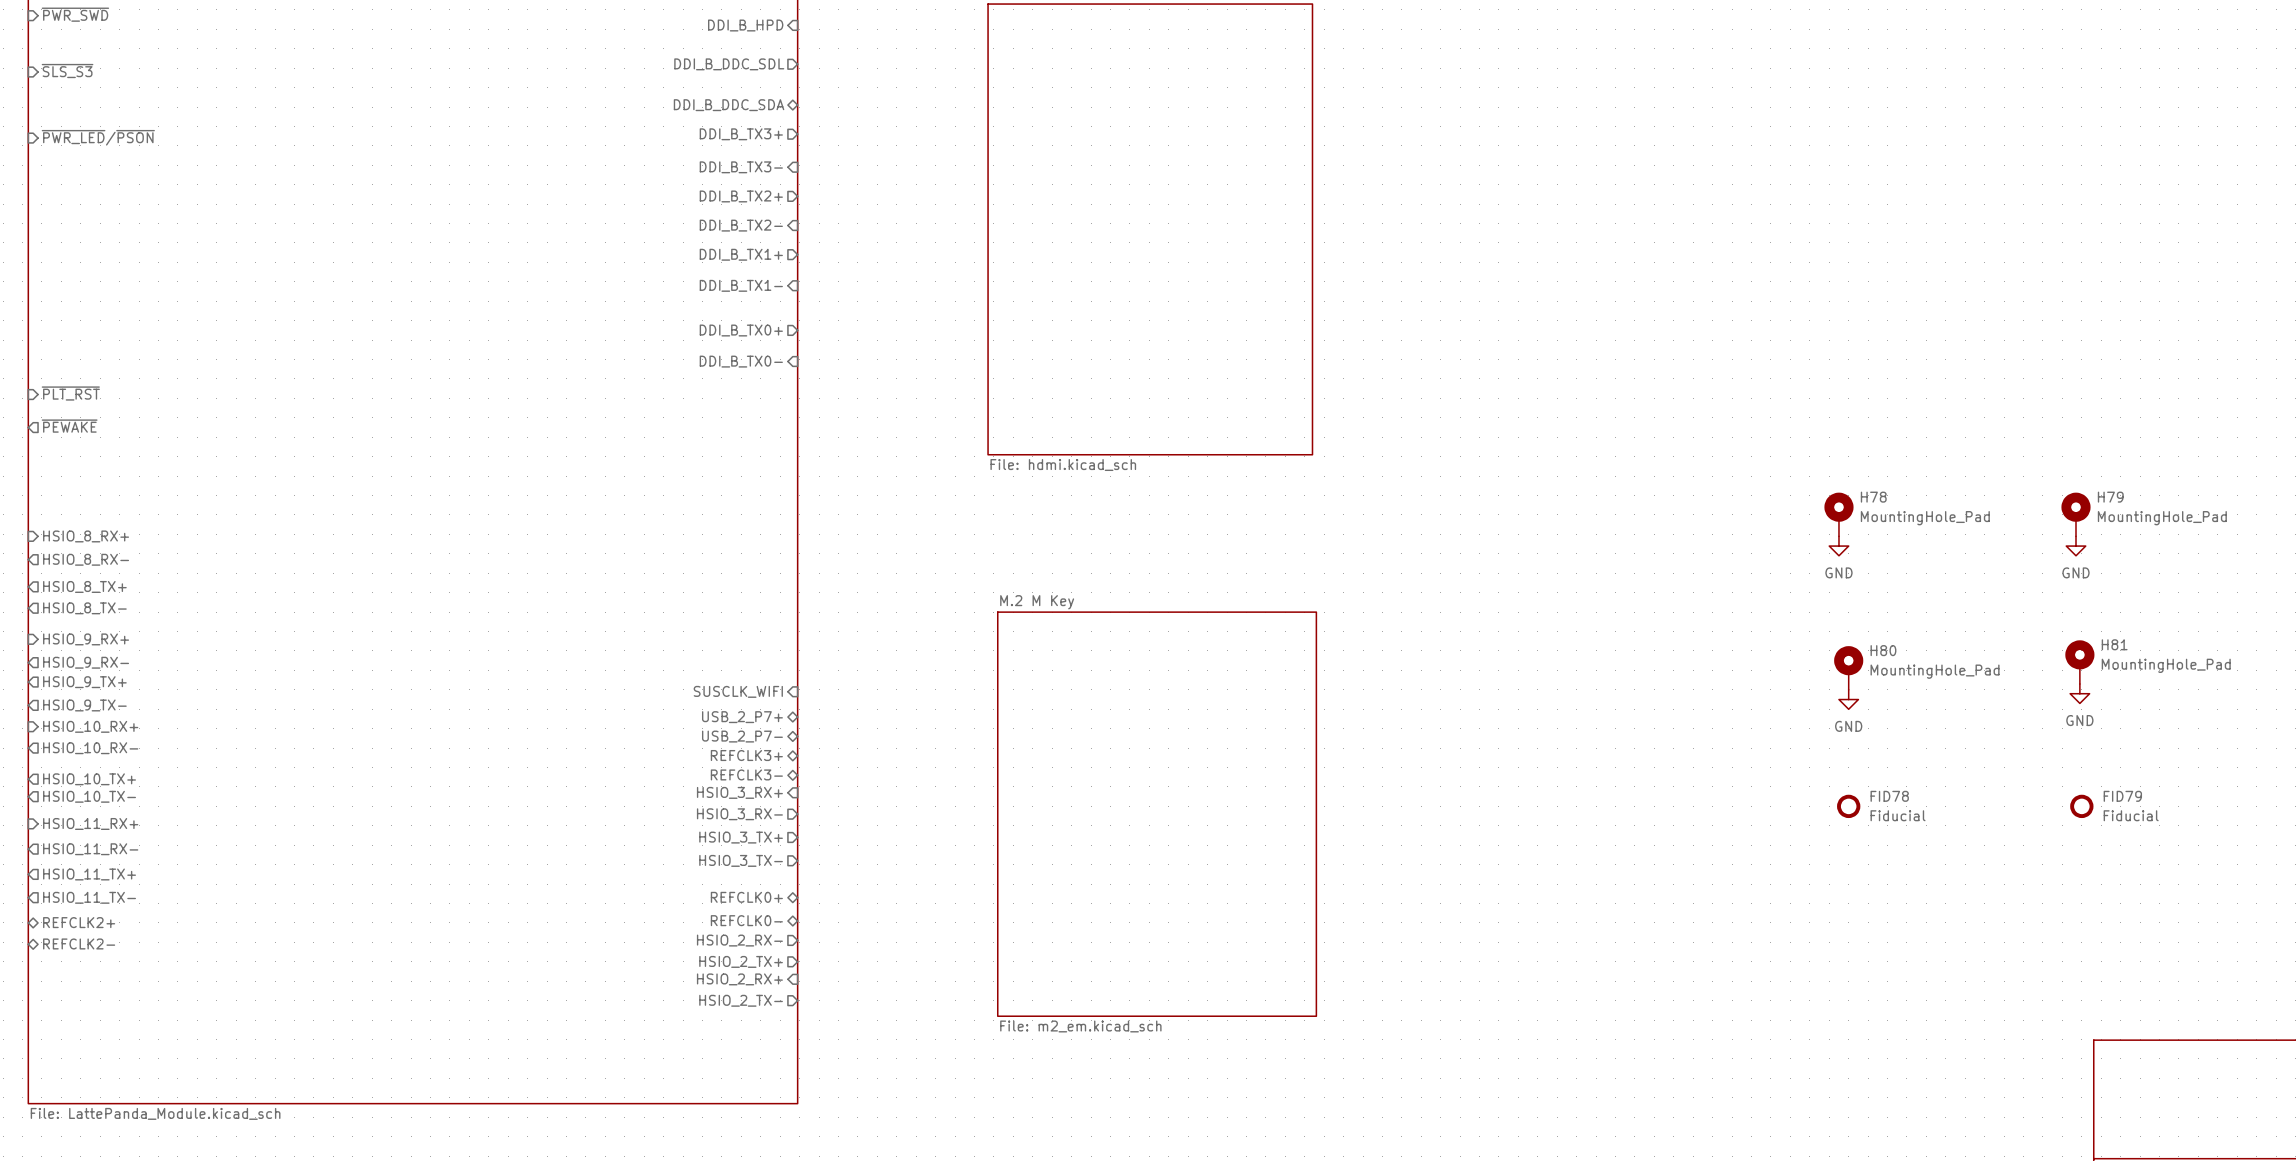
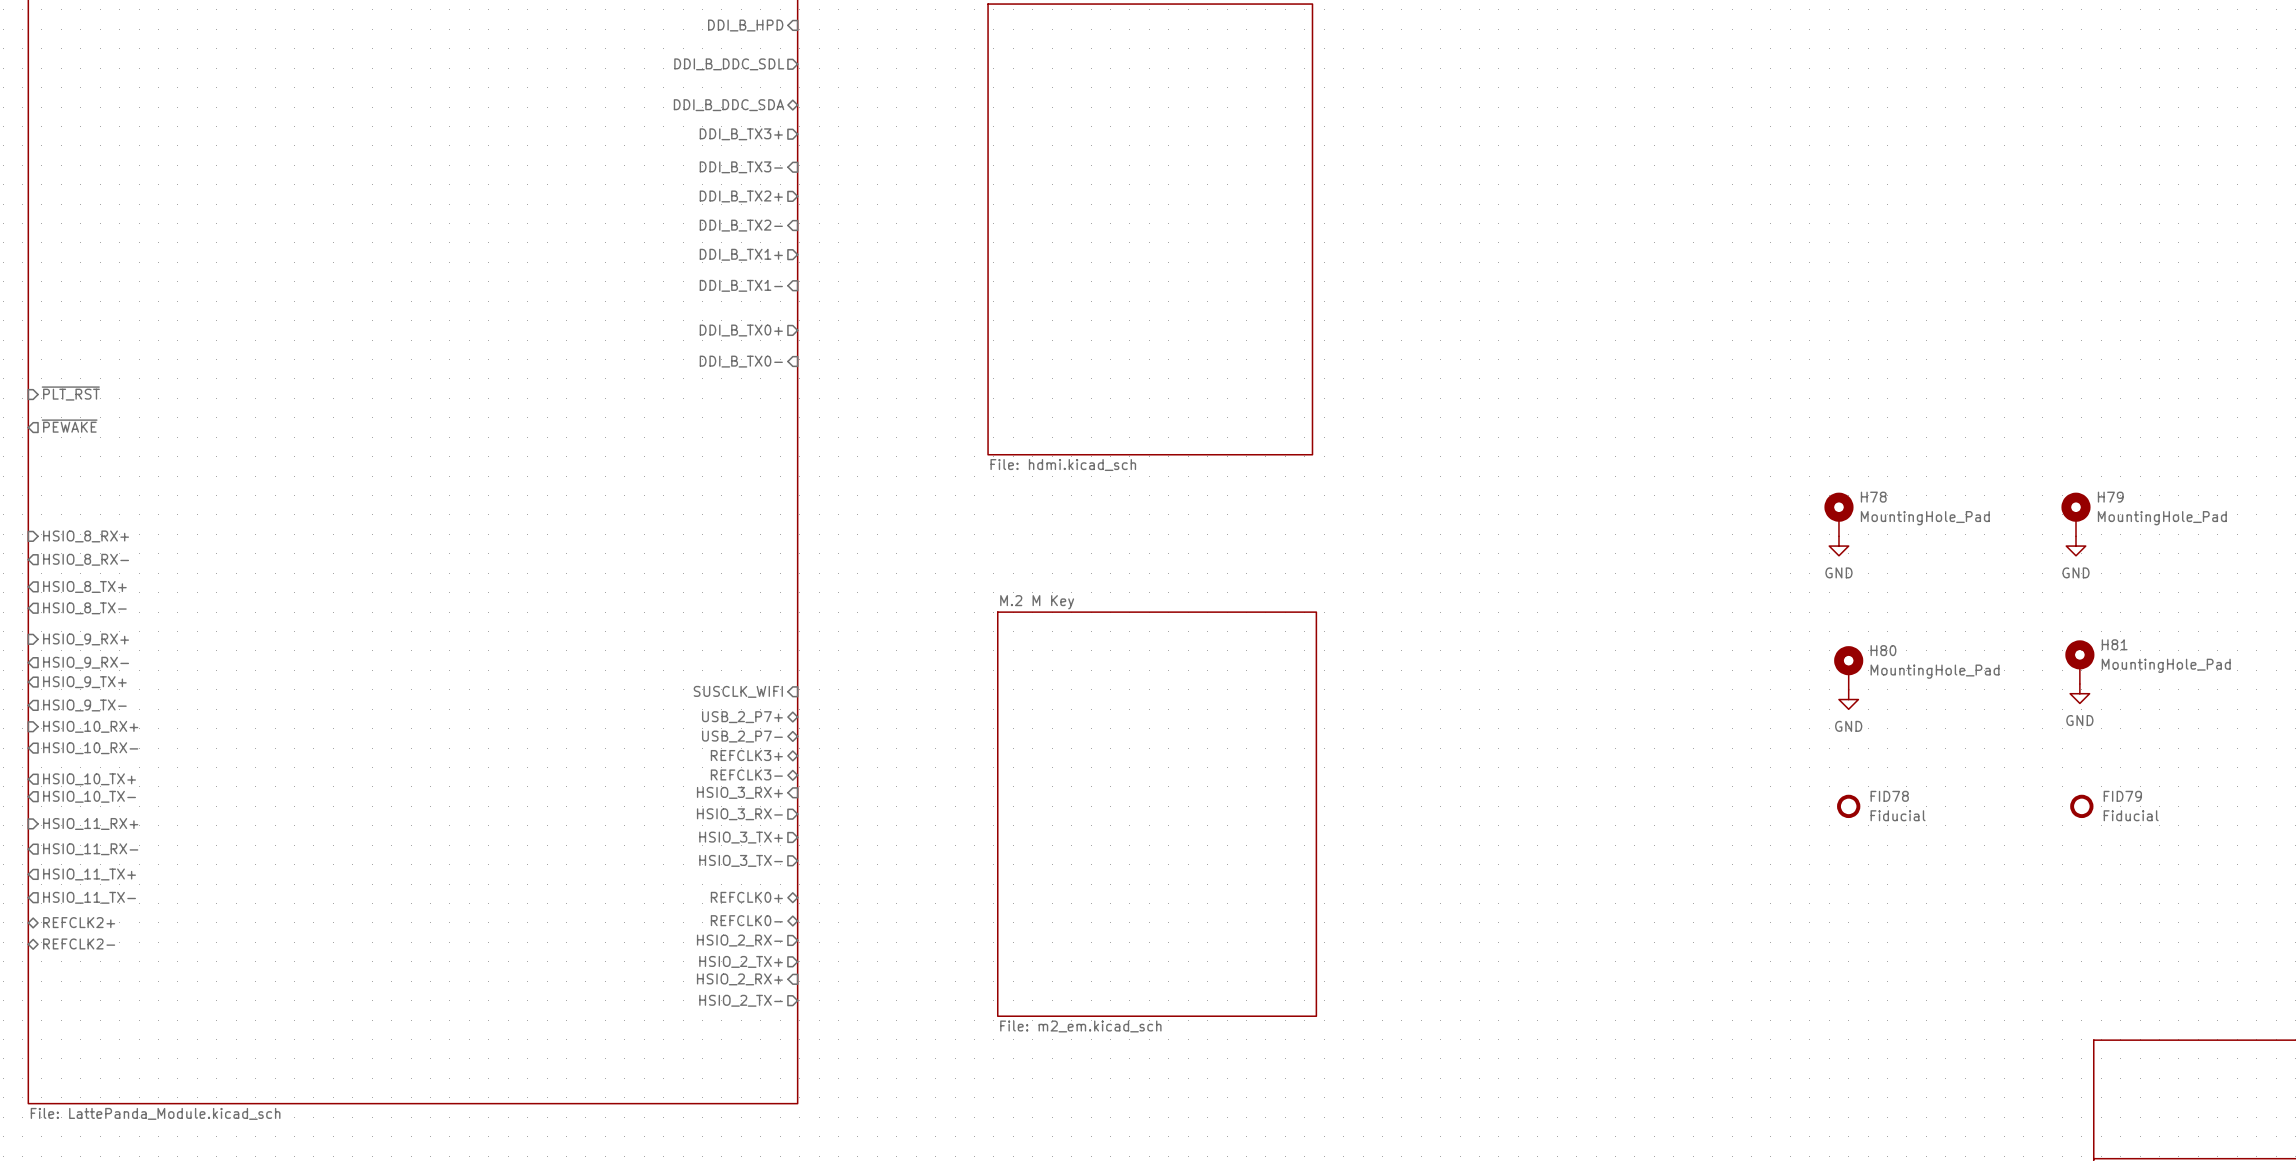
sheet pin: ~{PWR_SWD} (75, 14) -> none
sheet pin: ~{SLS_S3} (67, 71) -> none
sheet pin: ~{PWR_LED}/~{PSON} (98, 137) -> none

